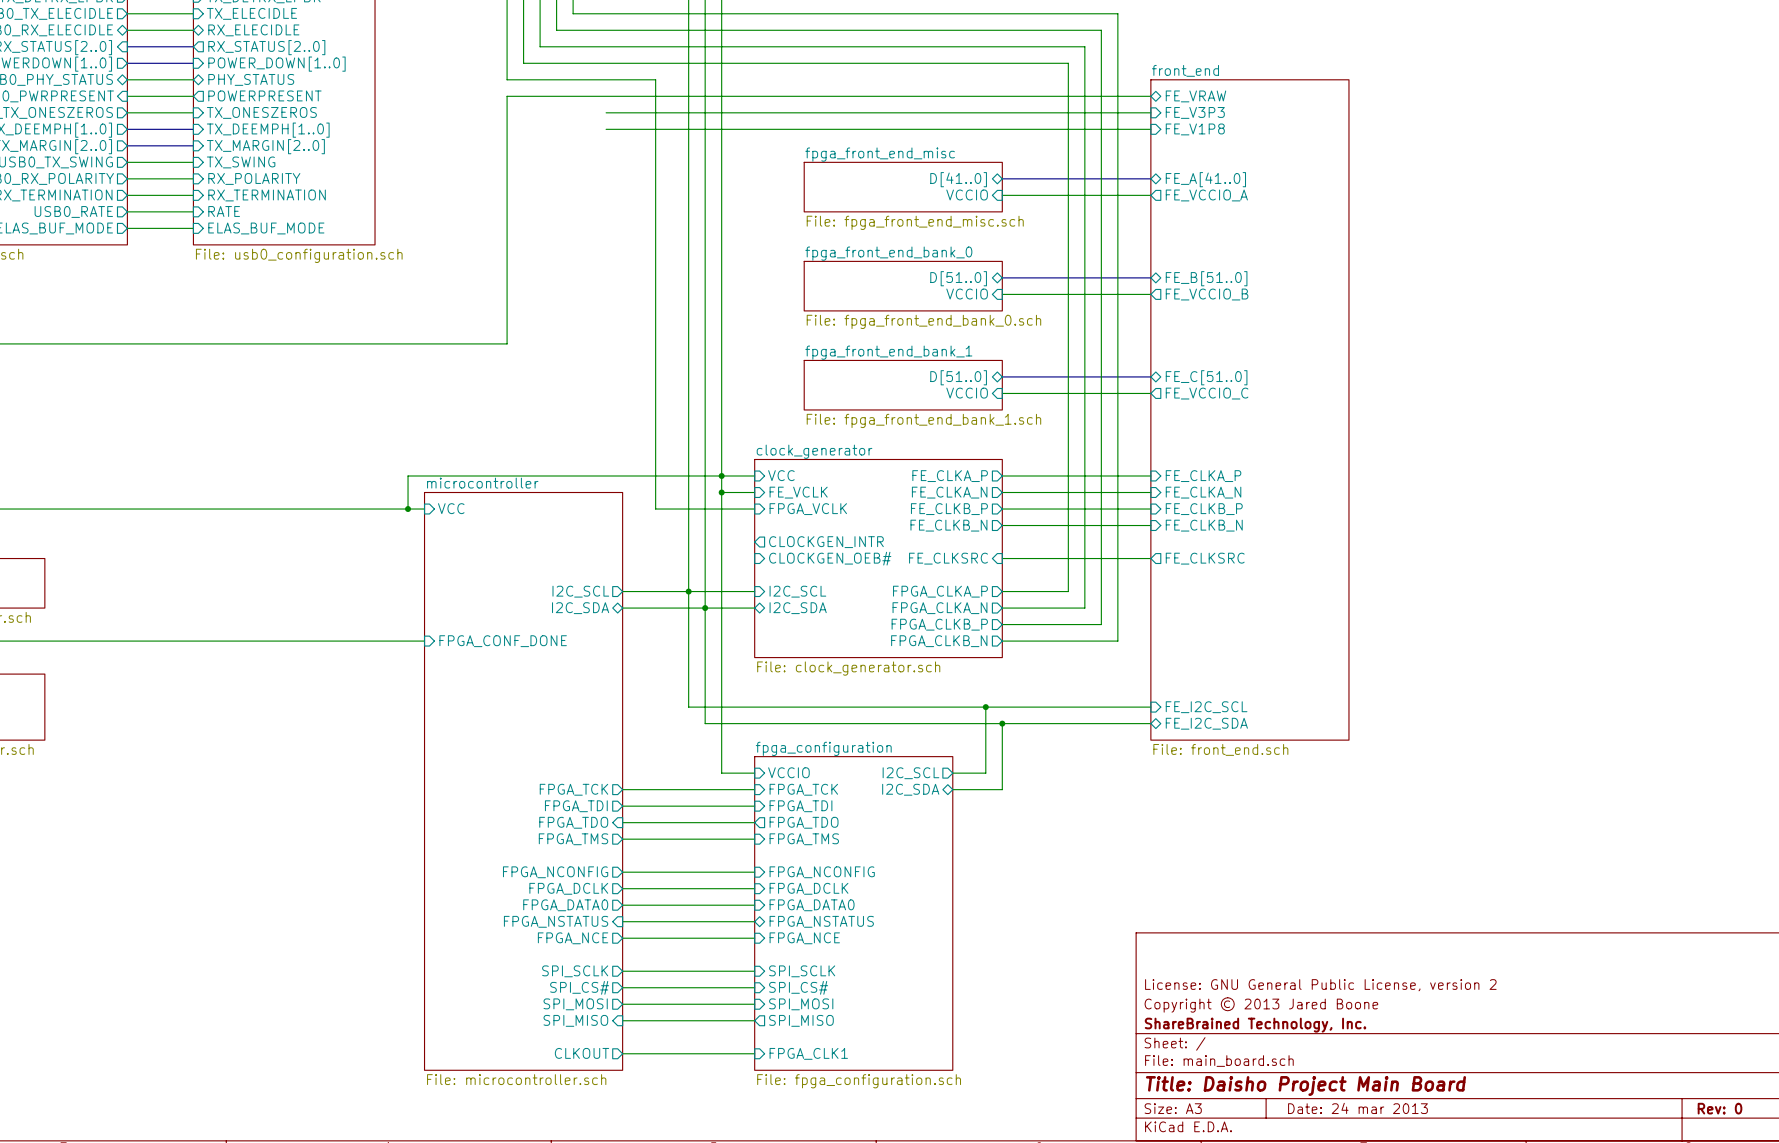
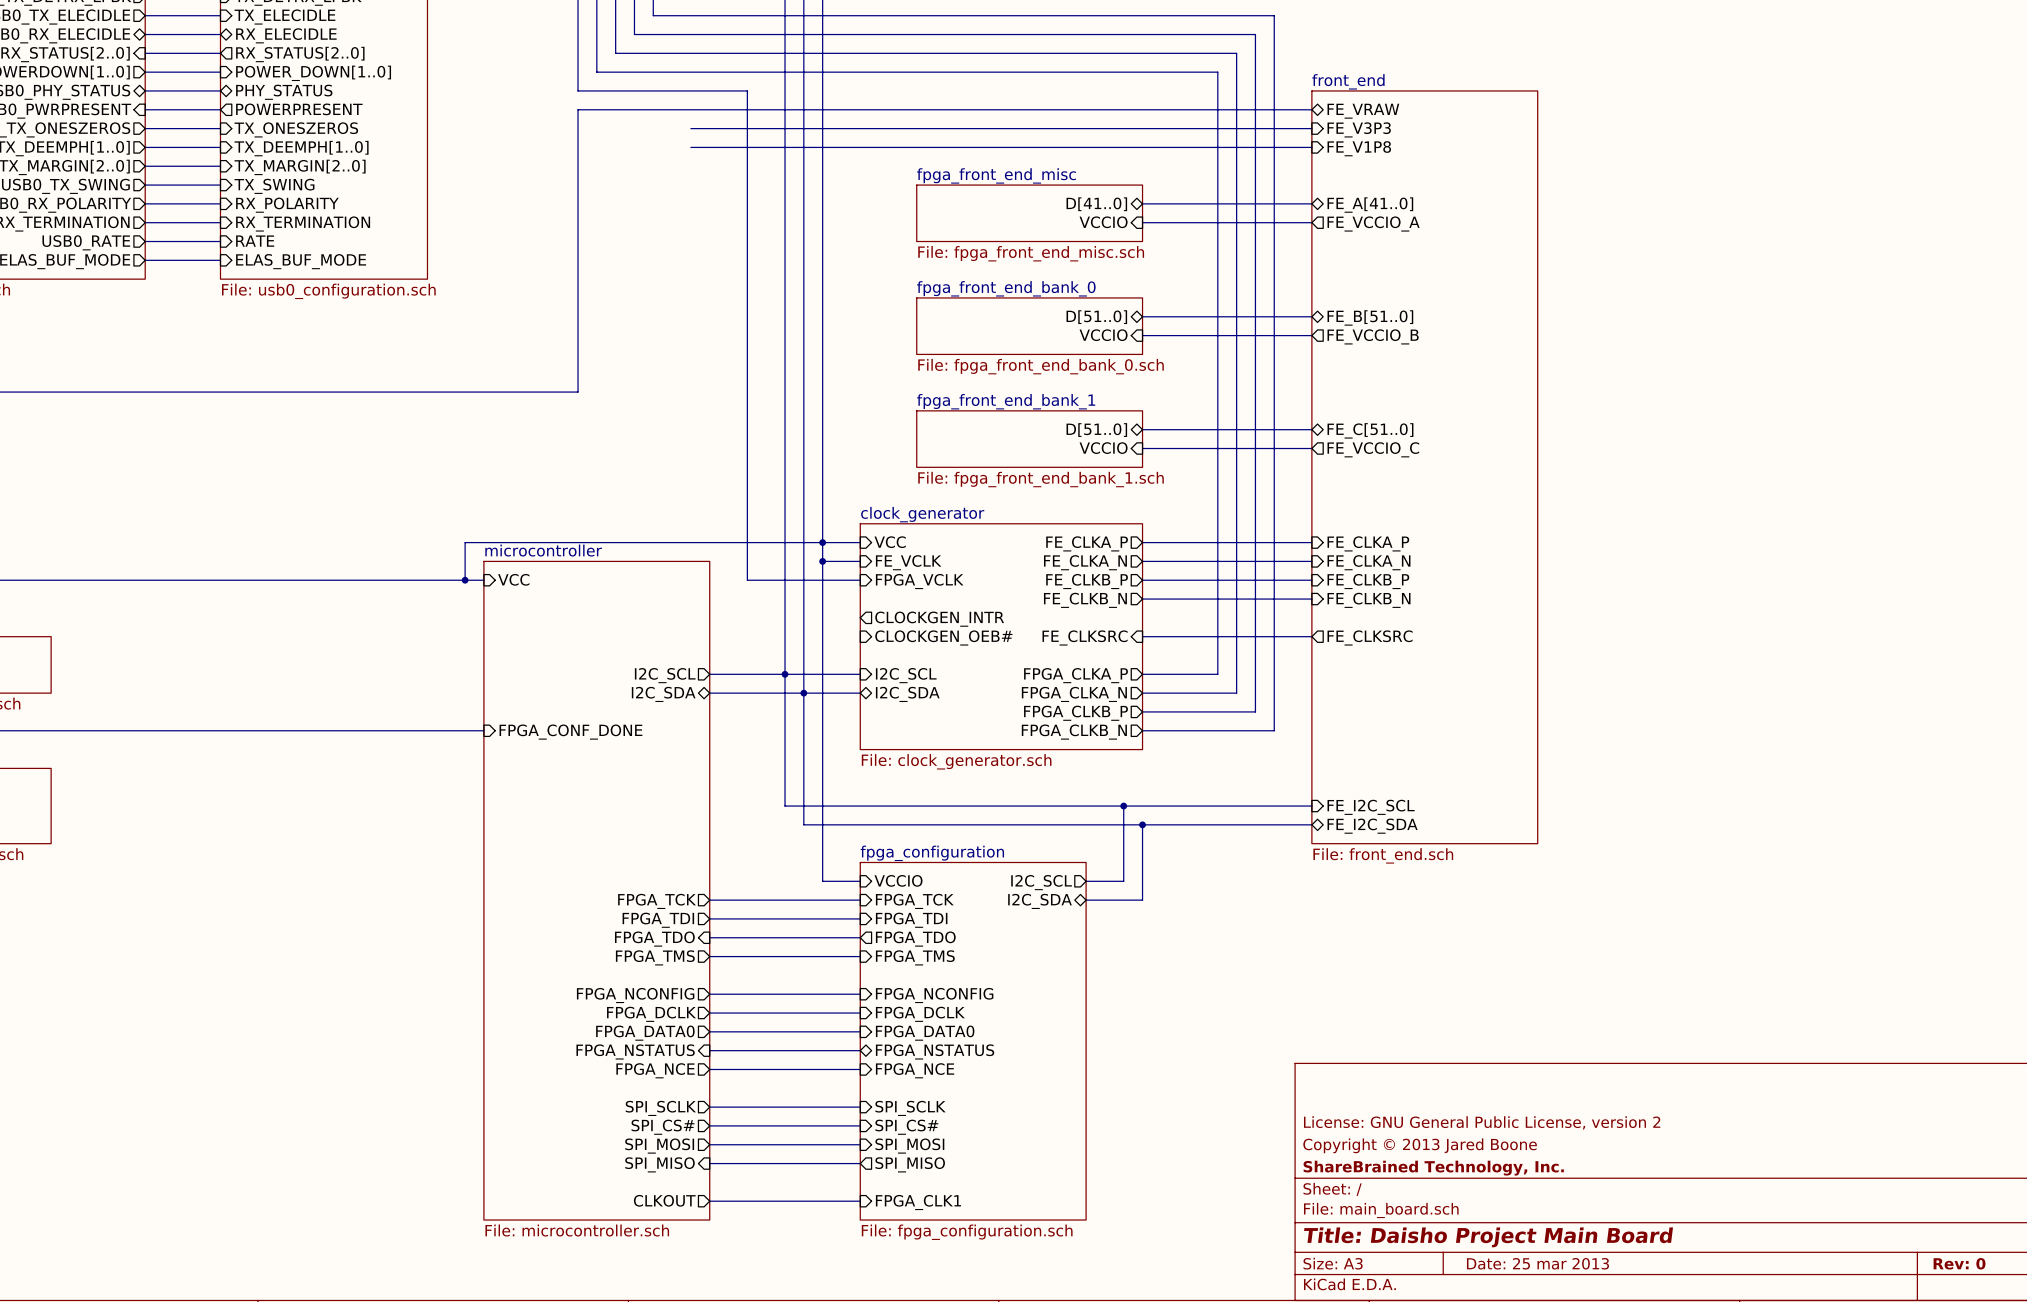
title block: Date: 24 mar 2013 (1357, 1108) -> Date: 25 mar 2013 (1537, 1263)

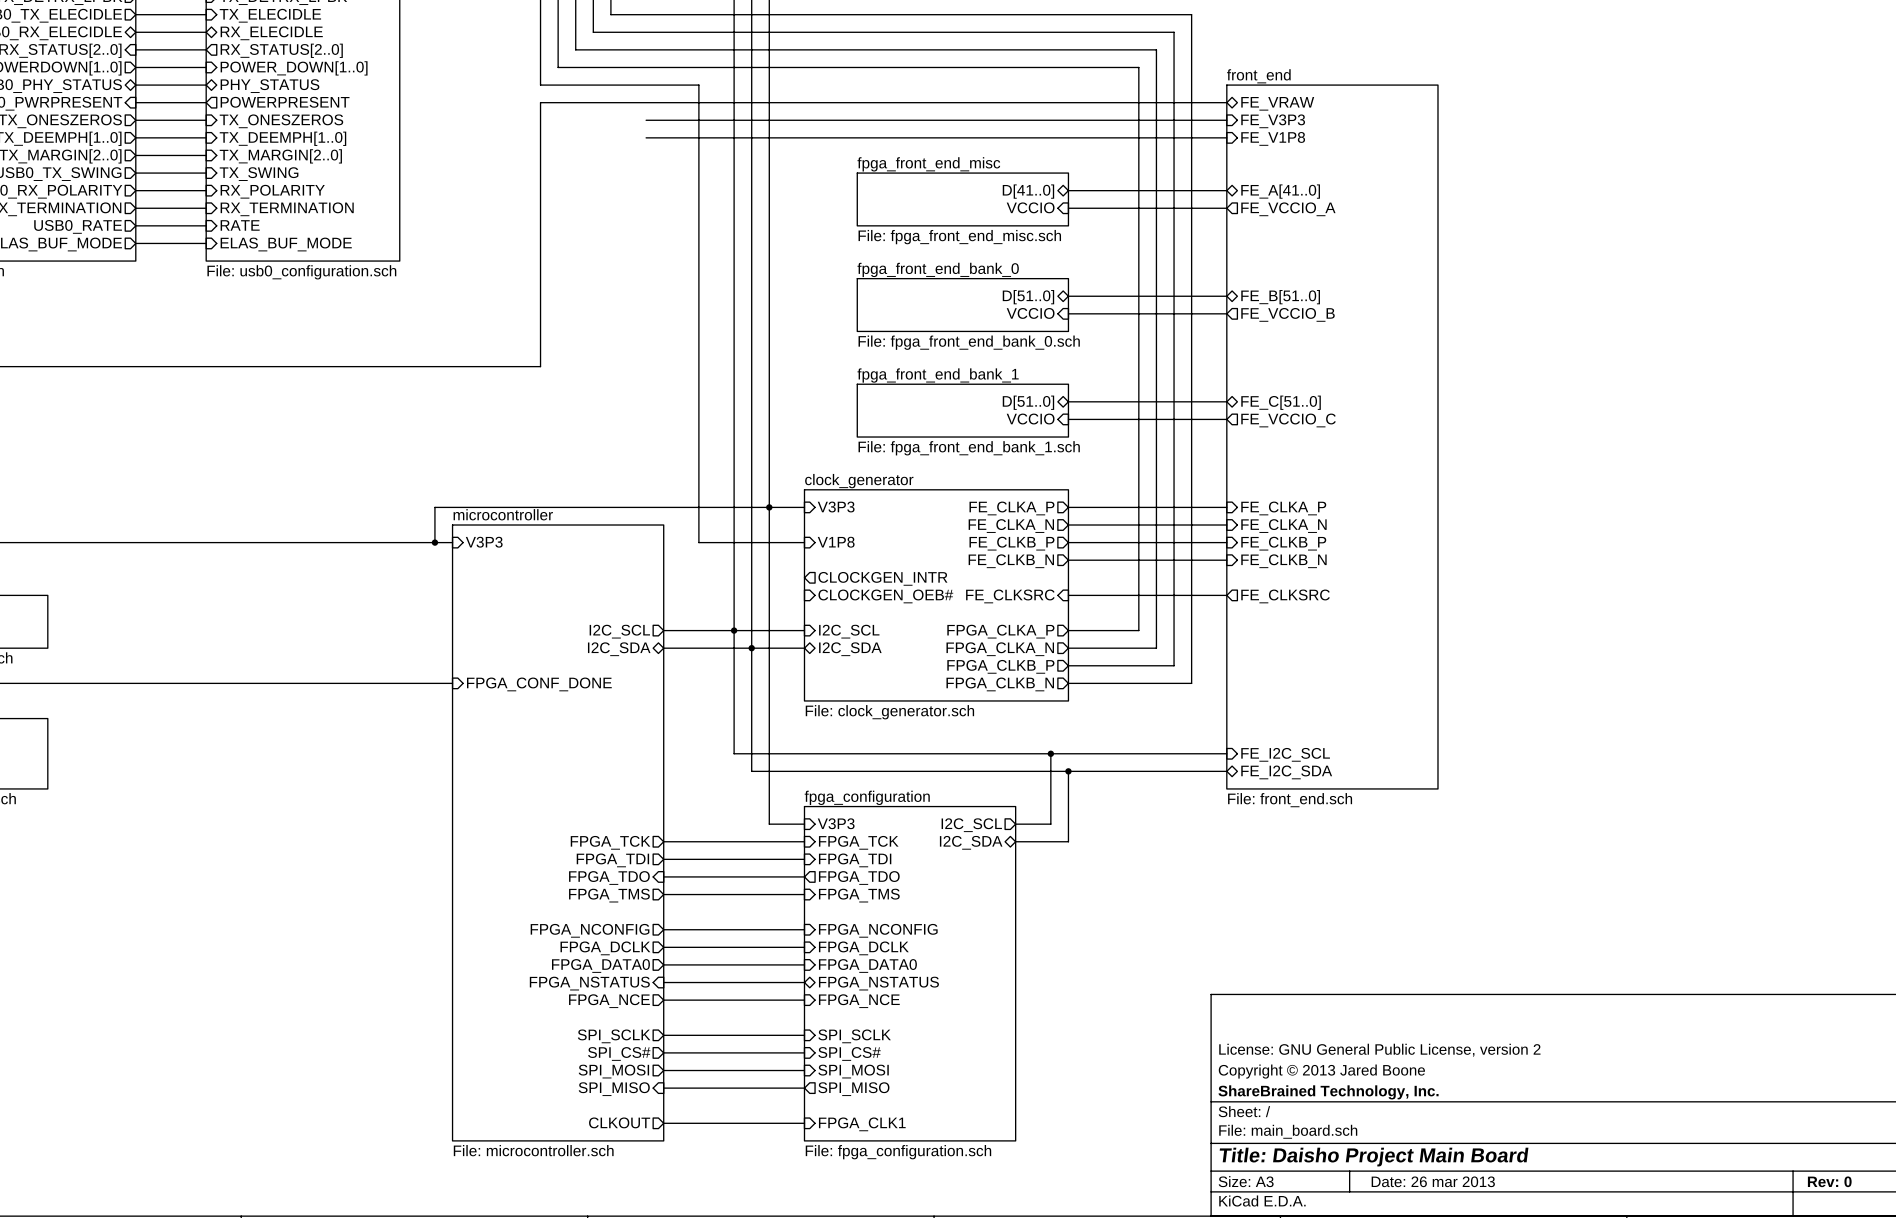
sheet pin: VCC (890, 542) -> V3P3 (836, 507)
wire: (822, 561) (860, 561) -> none
junction: (822, 561) -> none
sheet pin: FE_VCLK (908, 562) -> none
sheet pin: VCC (513, 579) -> V3P3 (484, 542)
sheet pin: FPGA_VCLK (919, 581) -> V1P8 (836, 542)
sheet pin: VCCIO (898, 880) -> V3P3 (836, 823)
title block: Date: 25 mar 2013 (1537, 1263) -> Date: 26 mar 2013 (1433, 1181)

